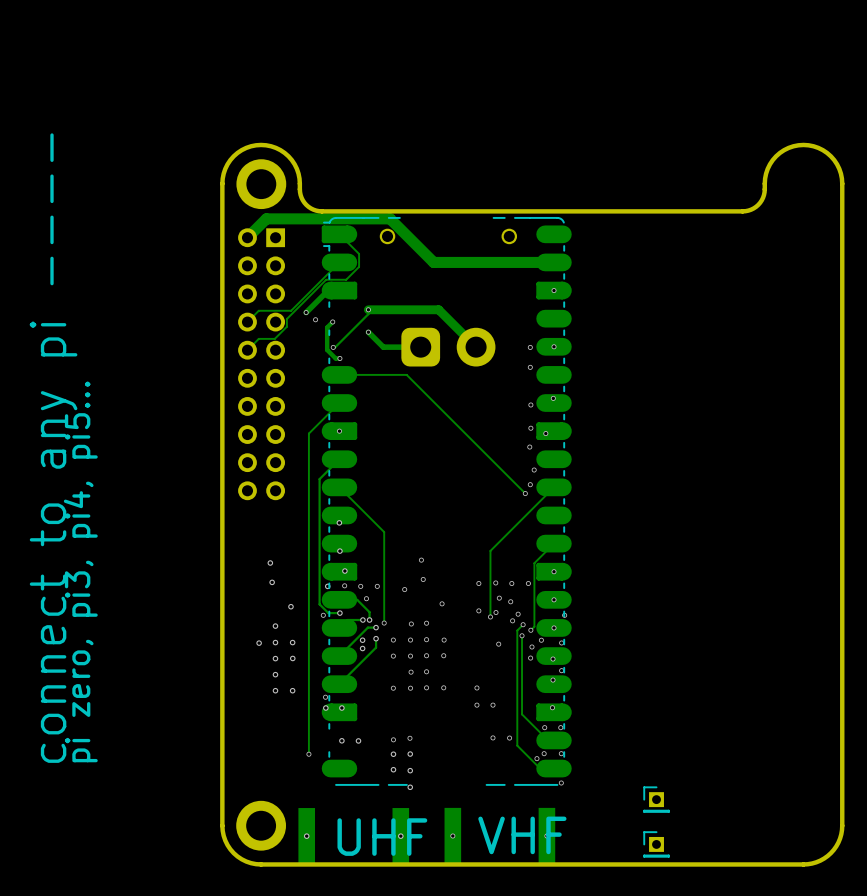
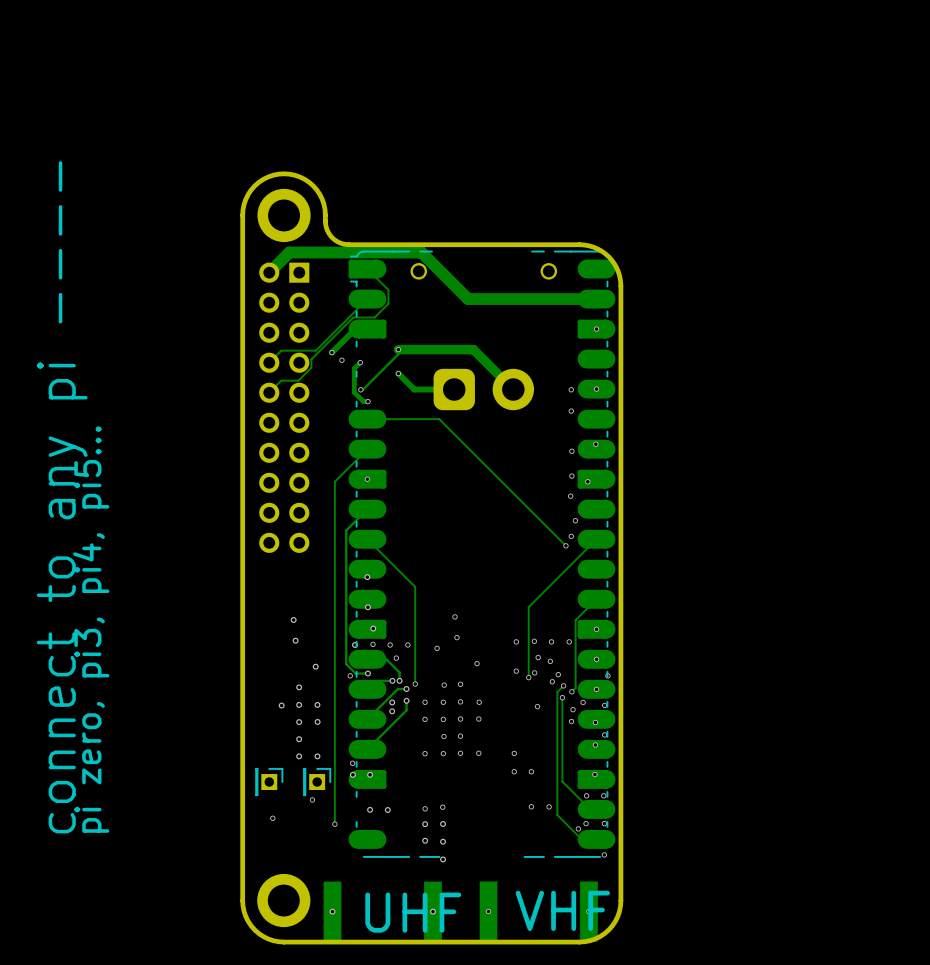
board edge: (842, 183) (842, 825) (838, 842) (830, 853) (820, 860) (803, 864) (261, 864) (246, 861) (233, 853) (225, 840) (222, 825) (222, 183) (225, 168) (233, 156) (246, 147) (256, 145) (271, 146) (280, 150) (288, 156) (296, 168) (300, 194) (304, 202) (310, 208) (321, 211) (745, 211) (753, 208) (761, 200) (766, 173) (772, 160) (784, 150) (803, 144) (818, 147) (830, 156) (839, 168) (842, 183) -> (325, 215) (326, 227) (330, 235) (337, 241) (345, 244) (584, 244) (593, 247) (605, 253) (611, 260) (618, 272) (620, 286) (620, 900) (617, 916) (612, 925) (595, 938) (579, 942) (284, 942) (268, 938) (258, 933) (245, 916) (242, 900) (243, 209) (245, 199) (254, 185) (268, 176) (284, 173) (299, 176) (313, 185) (322, 199) (325, 215)
part: none -> (269, 782)
part: none -> (317, 782)
via: none -> (312, 799)
via: none -> (272, 818)
part: (656, 799) -> none
part: (656, 844) -> none

